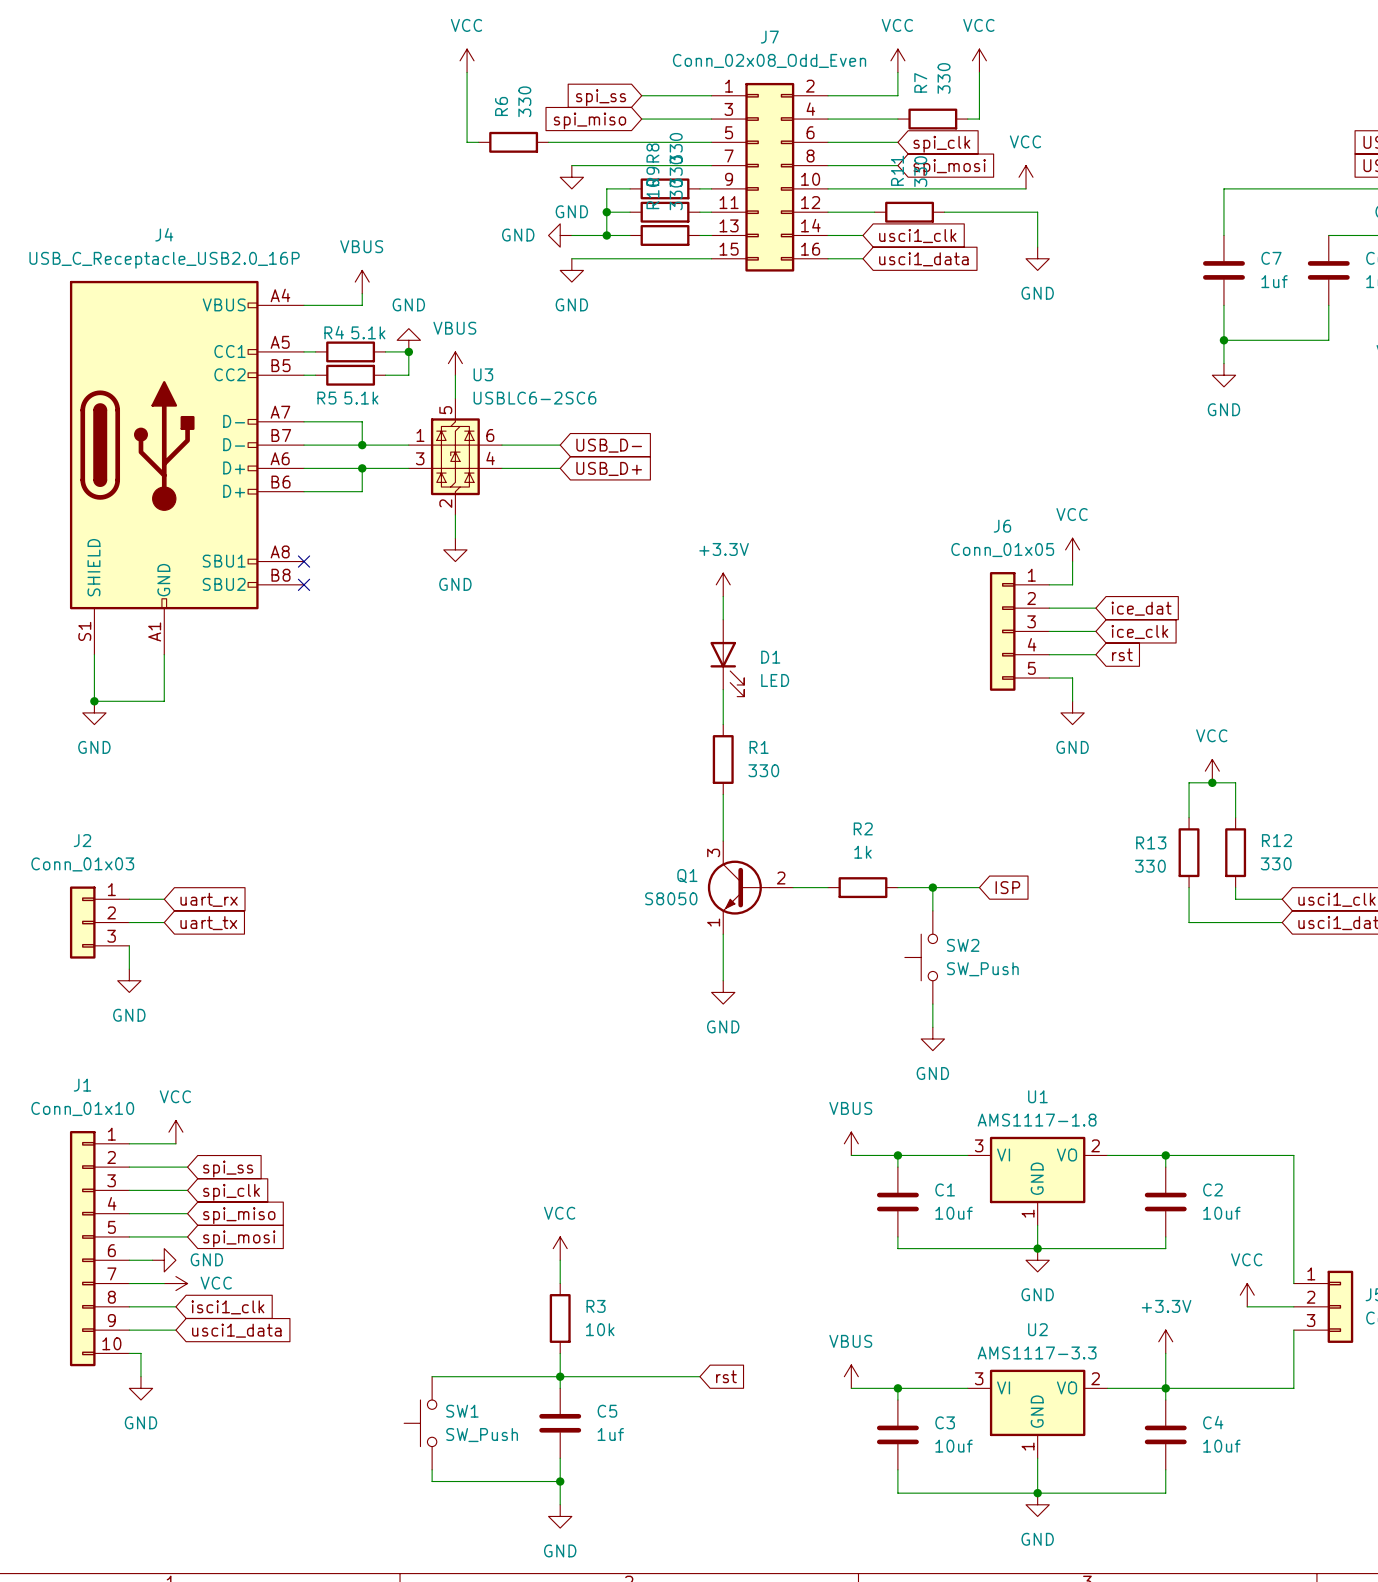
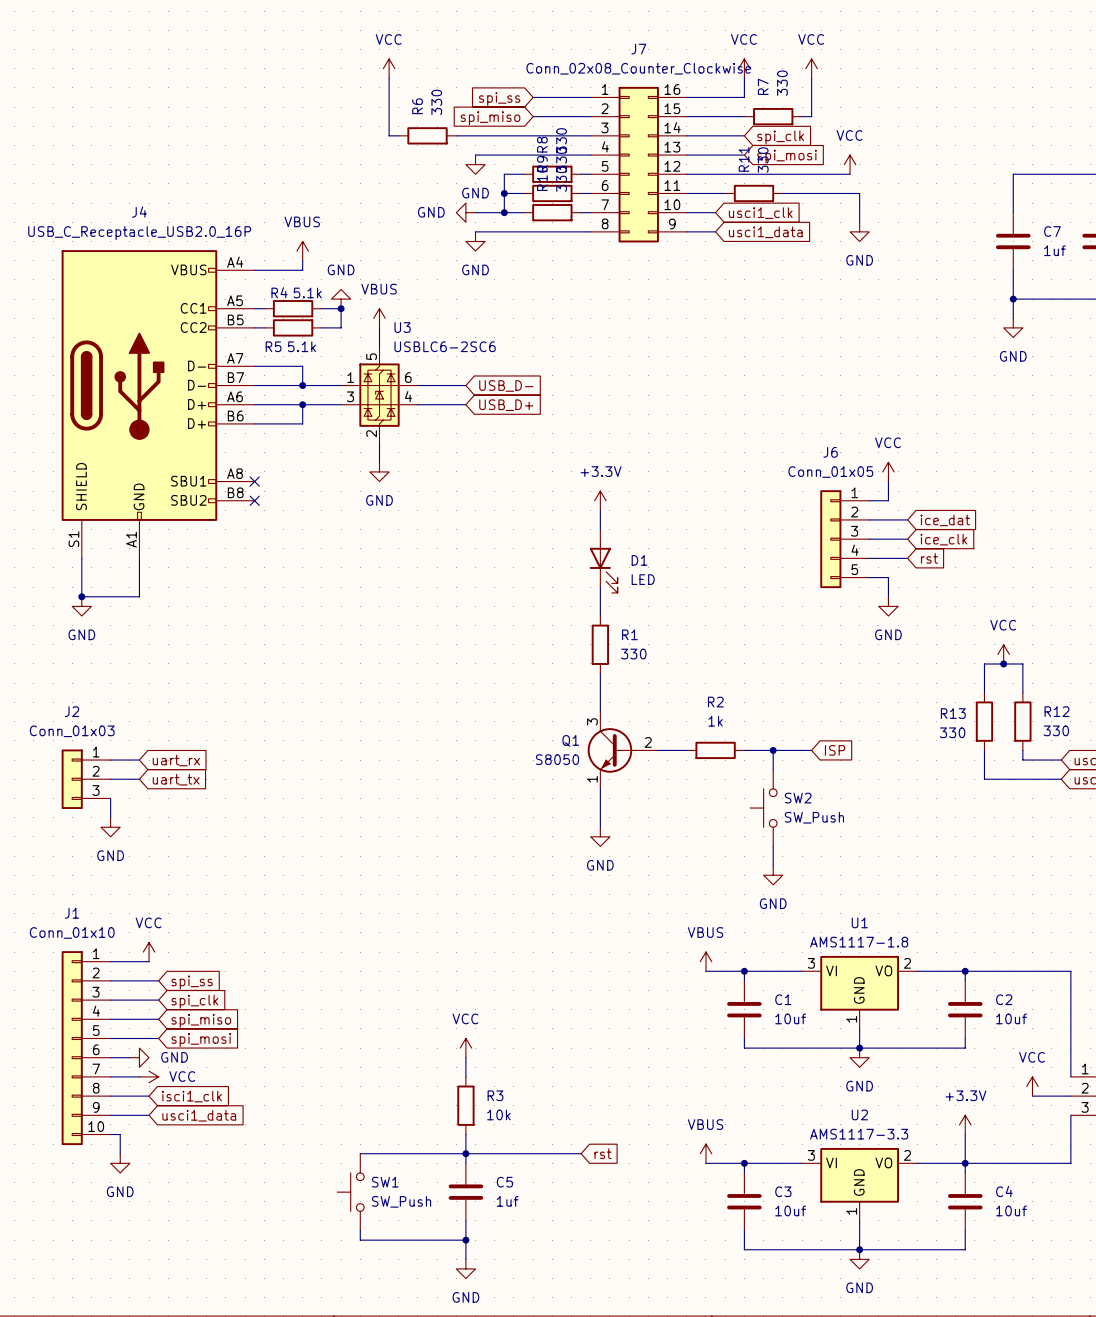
J7 value: Conn_02x08_Odd_Even (769, 60) -> Conn_02x08_Counter_Clockwise (638, 68)
J7 symbol: [711, 82, 829, 272] -> [590, 86, 687, 243]

